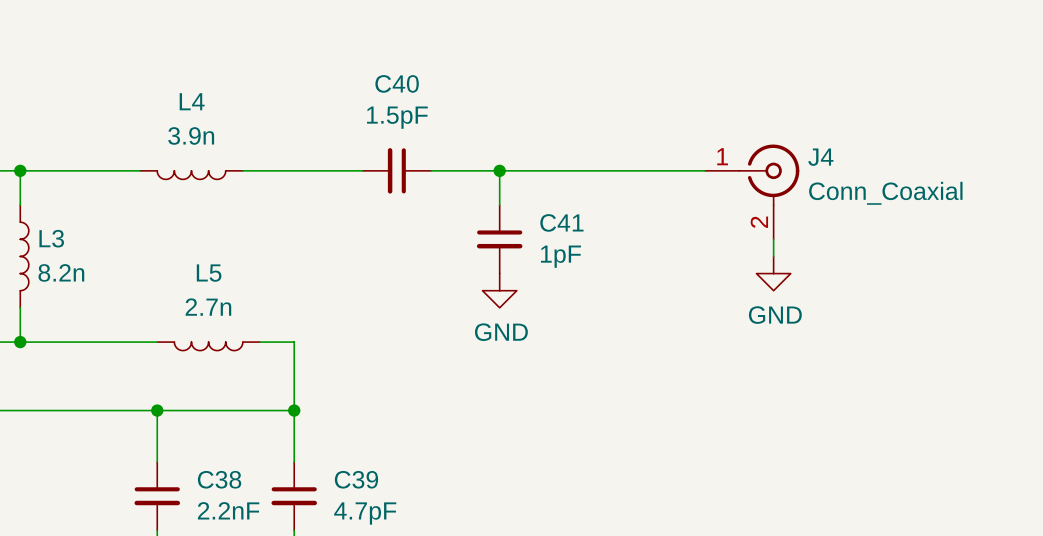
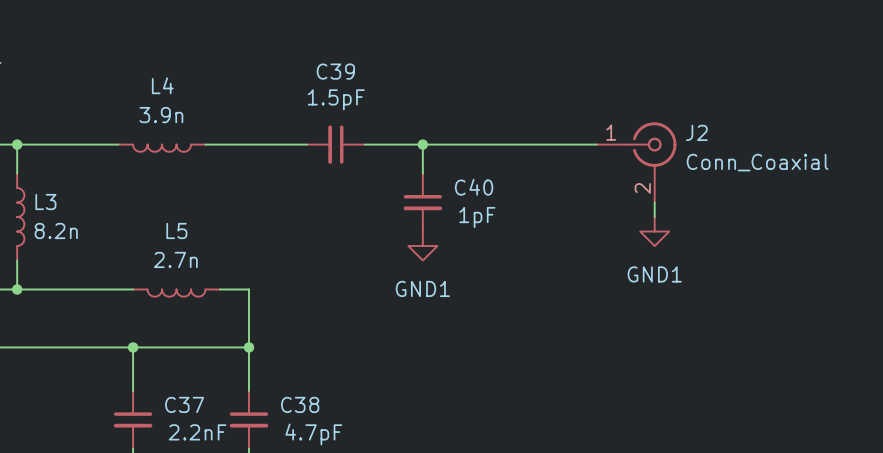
C40 name: C40 (397, 83) -> C39 (335, 71)
J4 name: J4 (820, 157) -> J2 (696, 132)
C41 name: C41 (561, 222) -> C40 (474, 187)
power symbol: GND (773, 273) -> GND1 (654, 231)
power symbol: GND (499, 290) -> GND1 (422, 246)
C38 name: C38 (219, 479) -> C37 (184, 404)
C39 name: C39 (356, 479) -> C38 (300, 404)

